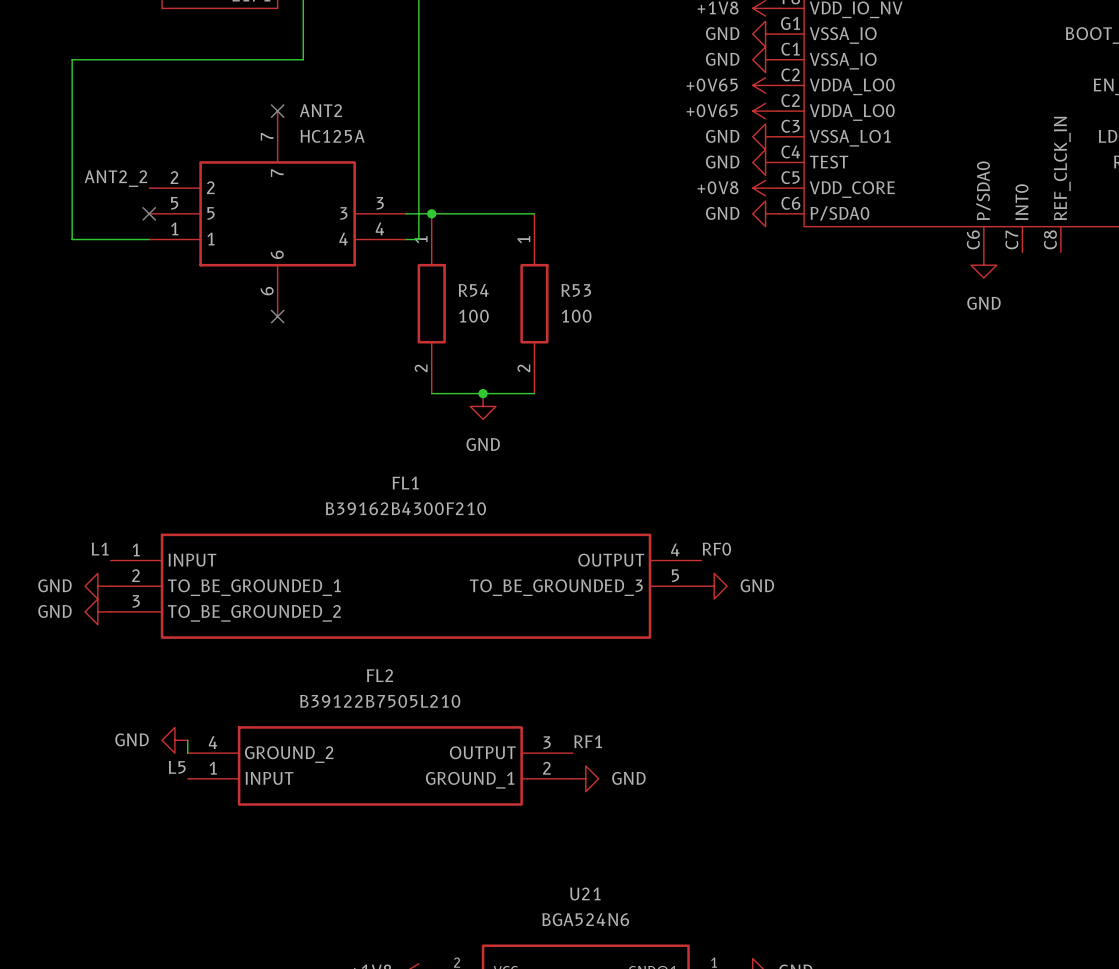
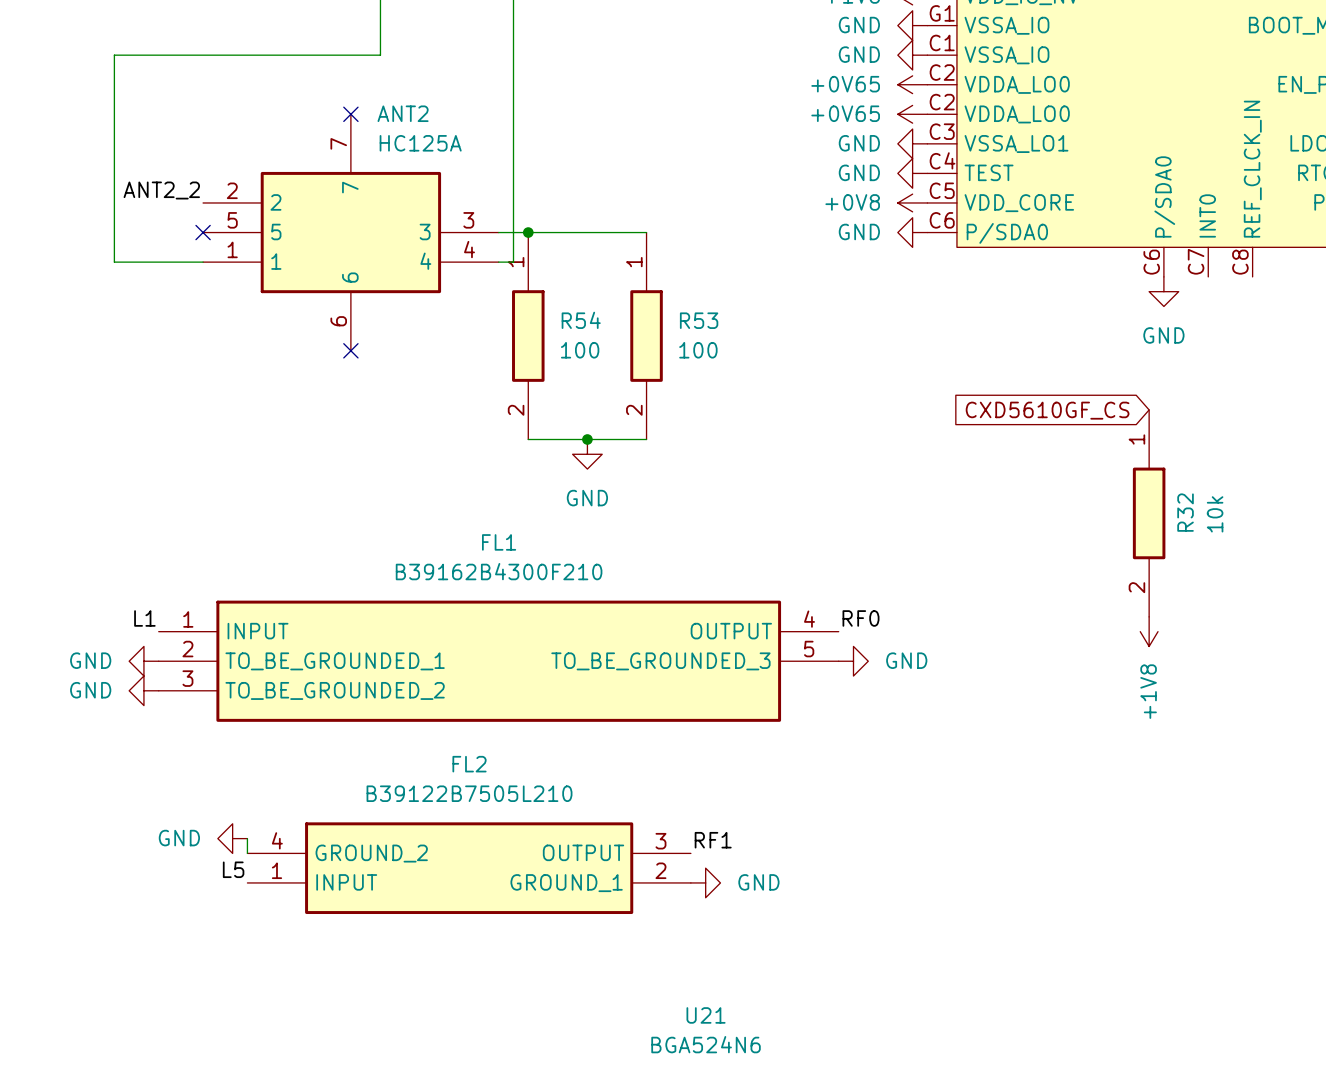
global label: none -> CXD5610GF_CS (1047, 410)
R32: none -> 10k (1149, 513)
power symbol: none -> +1V8 (1149, 631)

